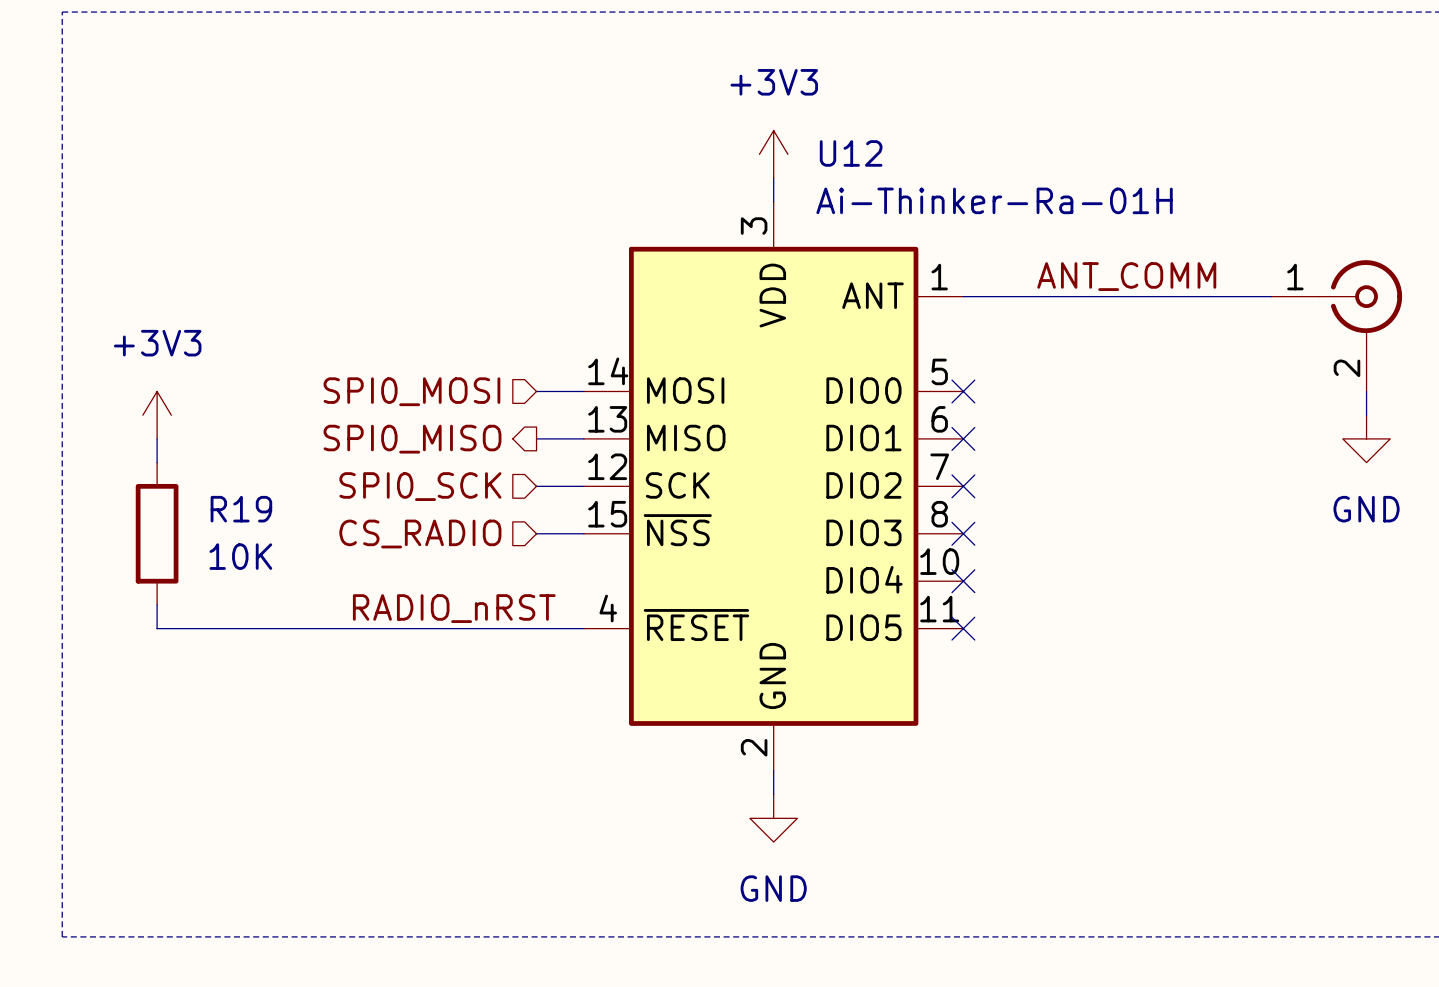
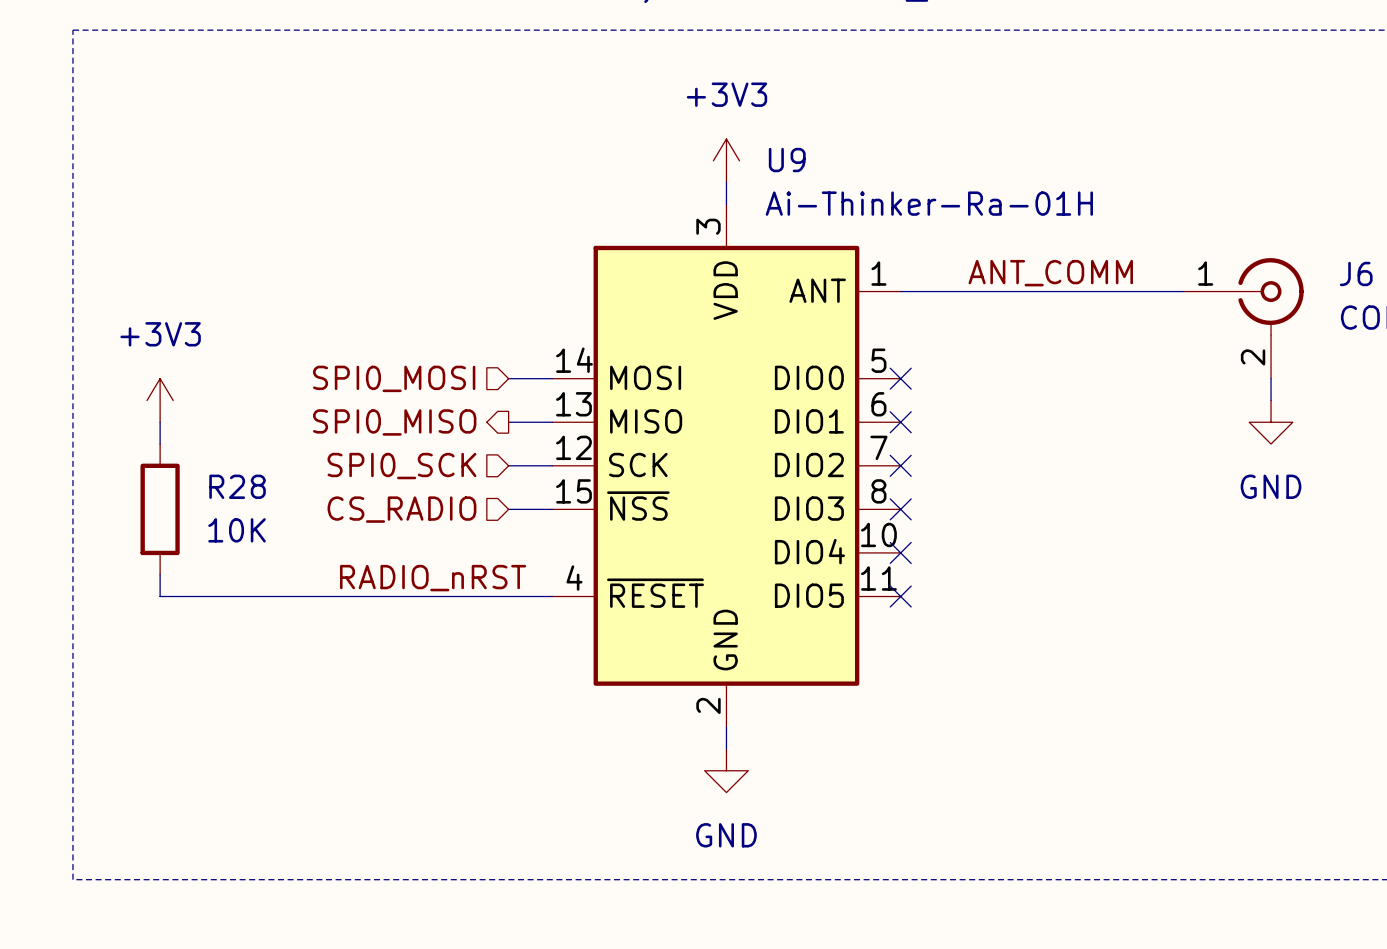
U12 name: U12 (851, 153) -> U9 (787, 160)
R19 name: R19 (241, 509) -> R28 (237, 486)

